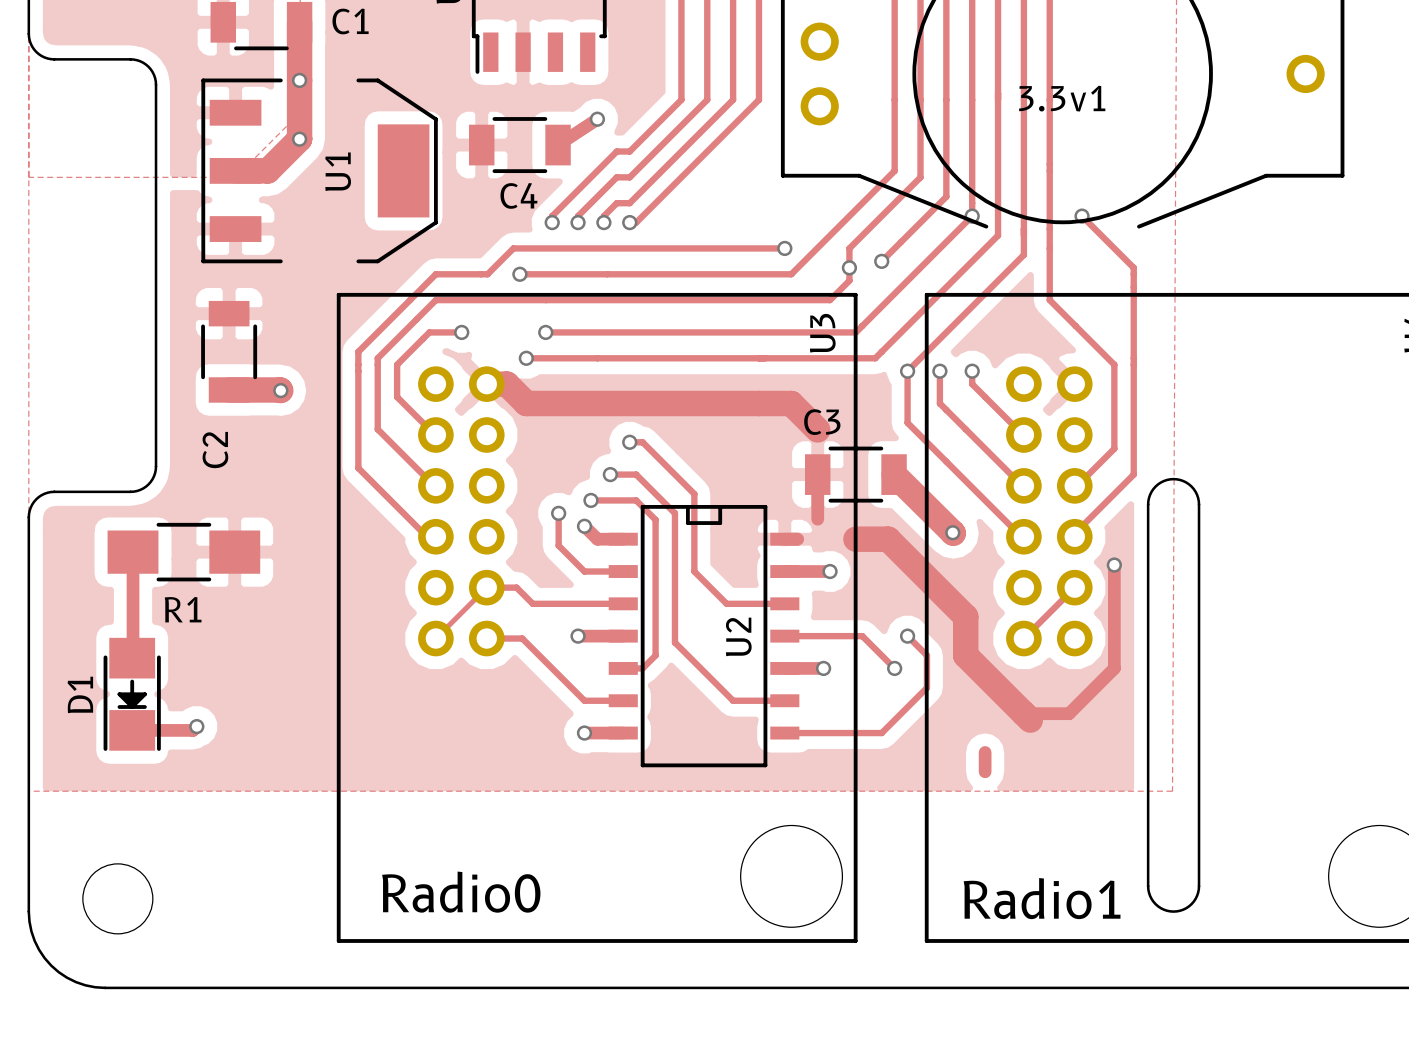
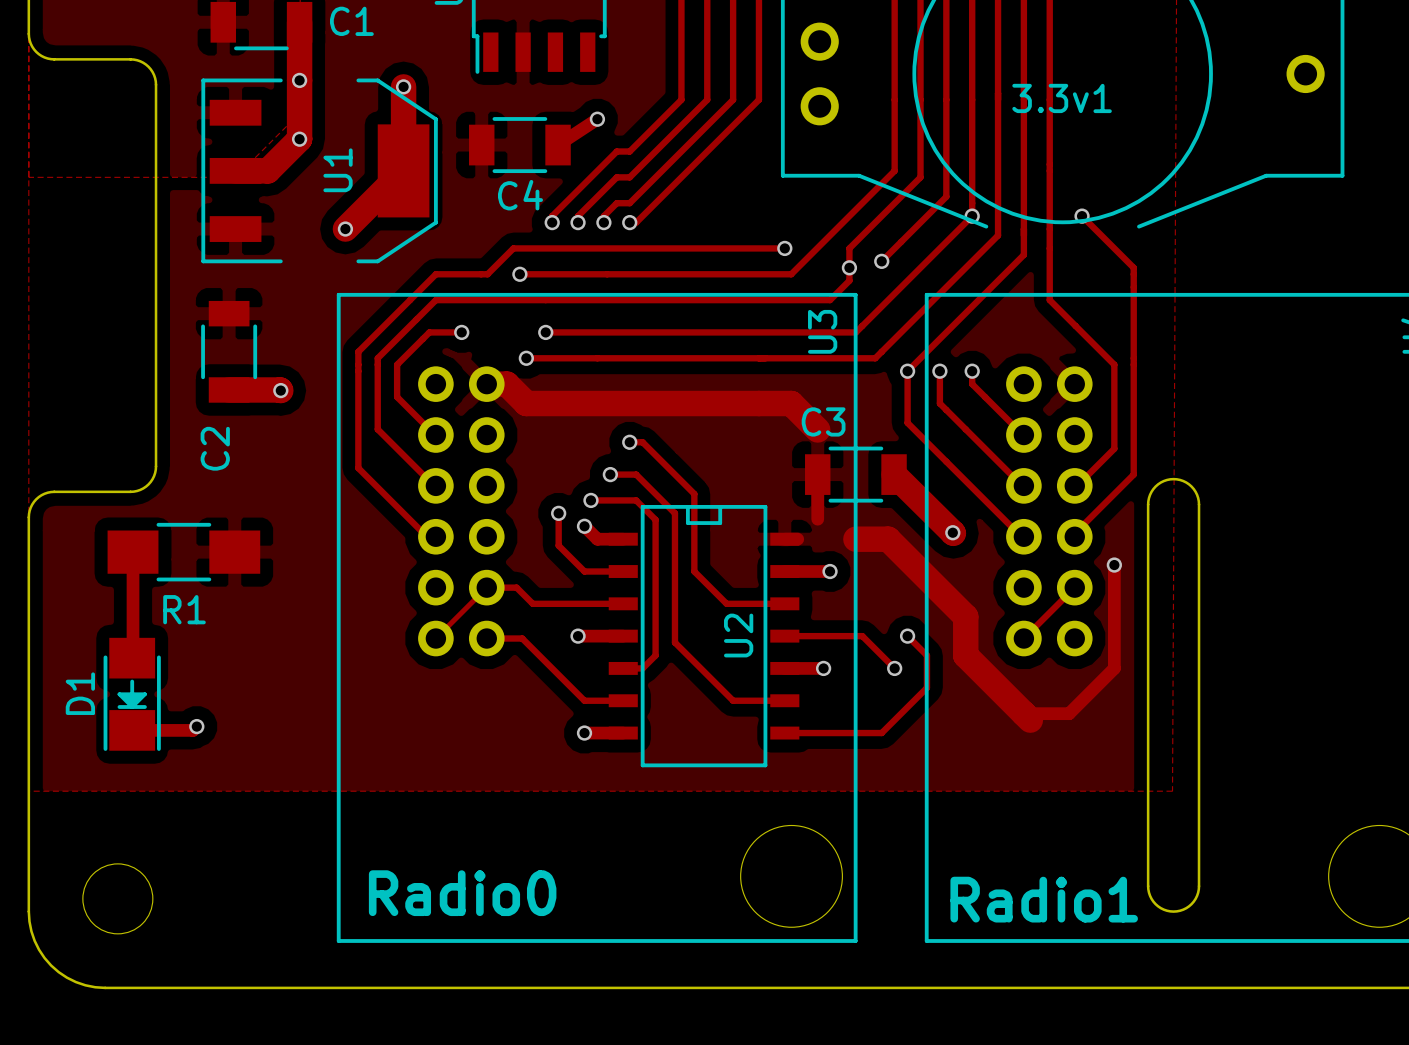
track: none -> (403, 86) (403, 170) (345, 229)
via: none -> (403, 86)
via: none -> (345, 229)
track: (985, 752) (985, 771) -> none

